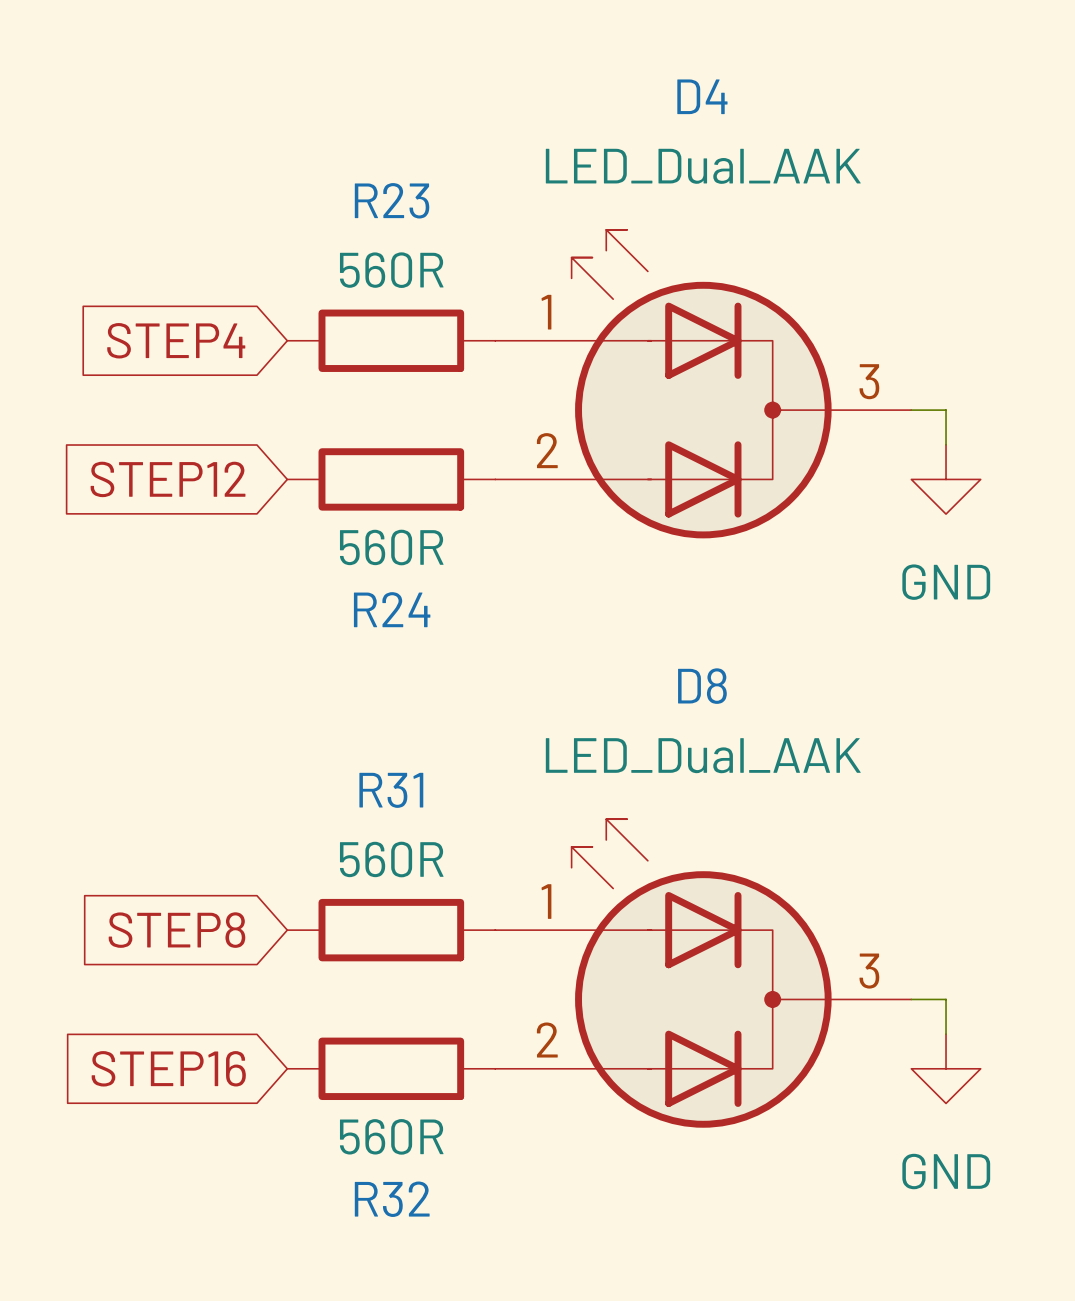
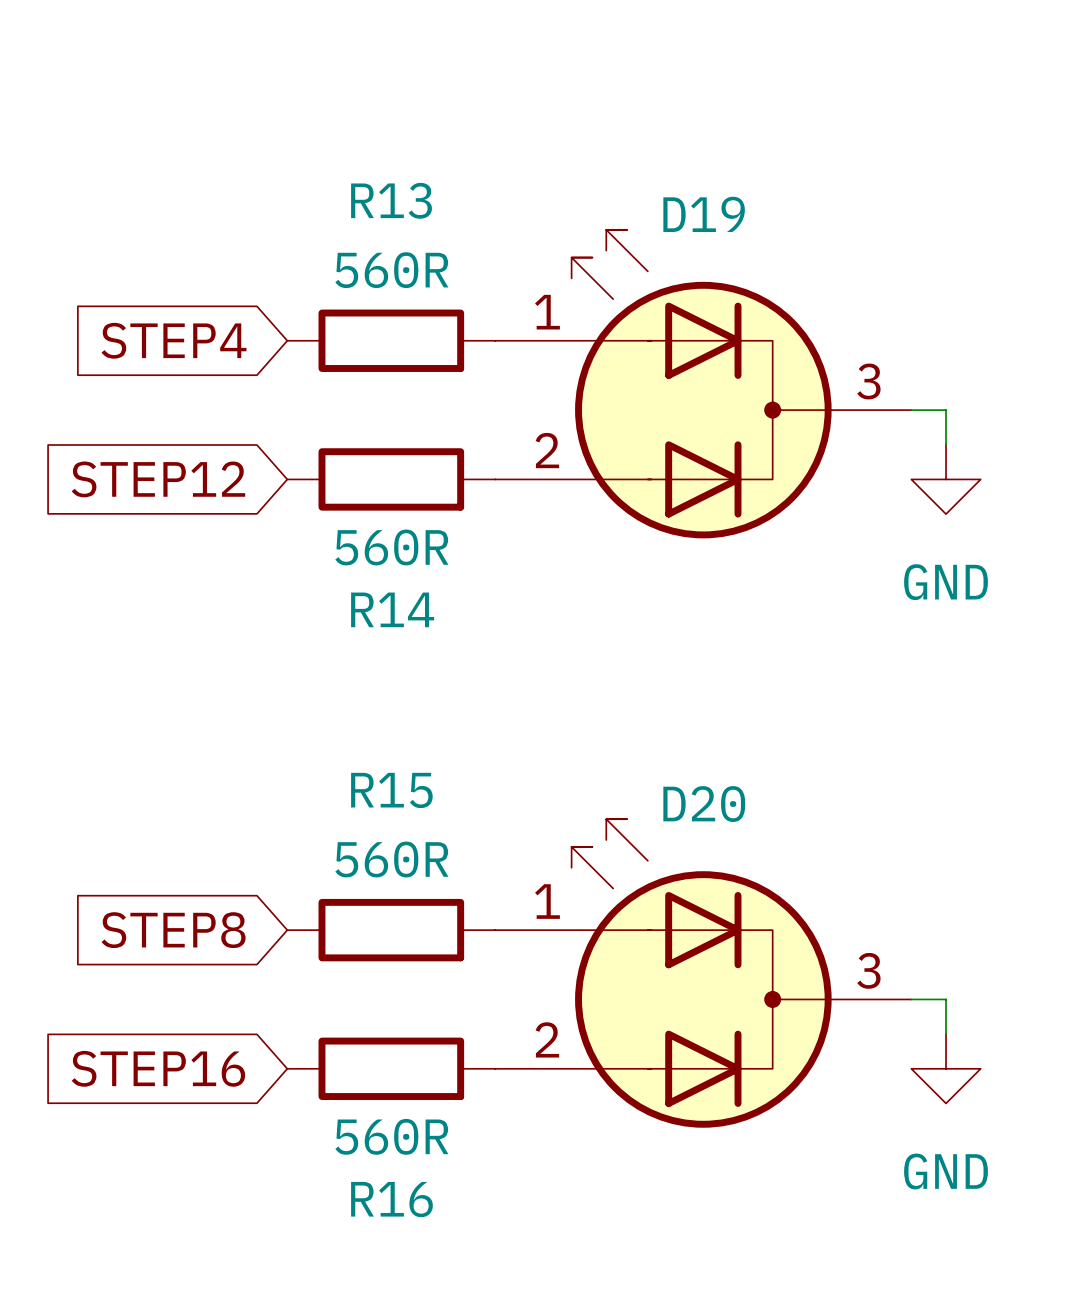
D4 name: D4 (702, 96) -> D19 (704, 214)
D4 value: LED_Dual_AAK (703, 166) -> none
R23 name: R23 (392, 200) -> R13 (391, 200)
R24 name: R24 (392, 609) -> R14 (392, 609)
D8 name: D8 (702, 686) -> D20 (704, 804)
D8 value: LED_Dual_AAK (703, 755) -> none
R31 name: R31 (391, 790) -> R15 (391, 790)
R32 name: R32 (392, 1199) -> R16 (391, 1199)

